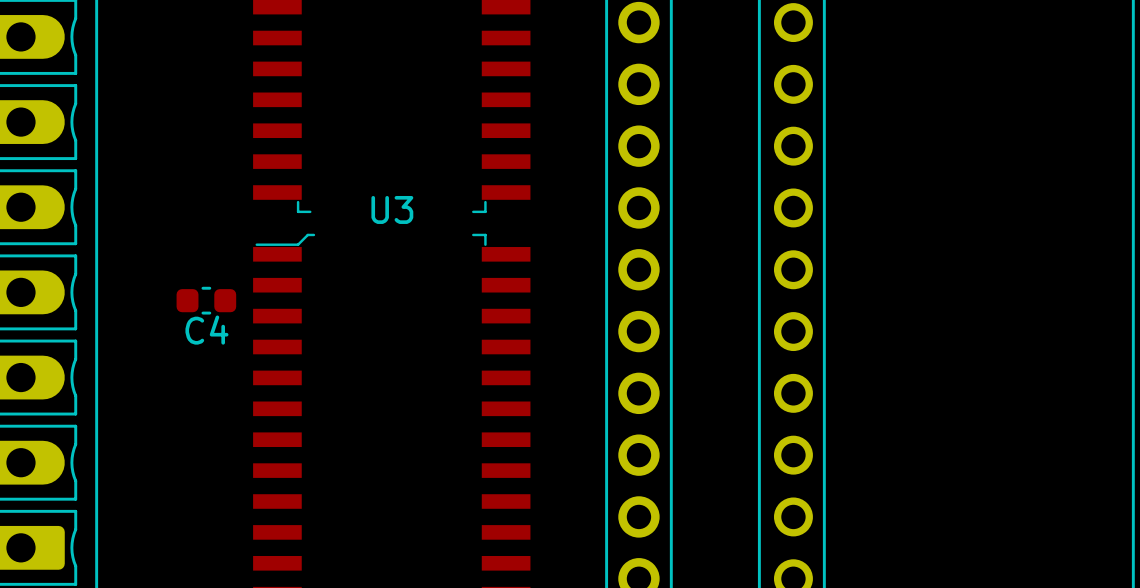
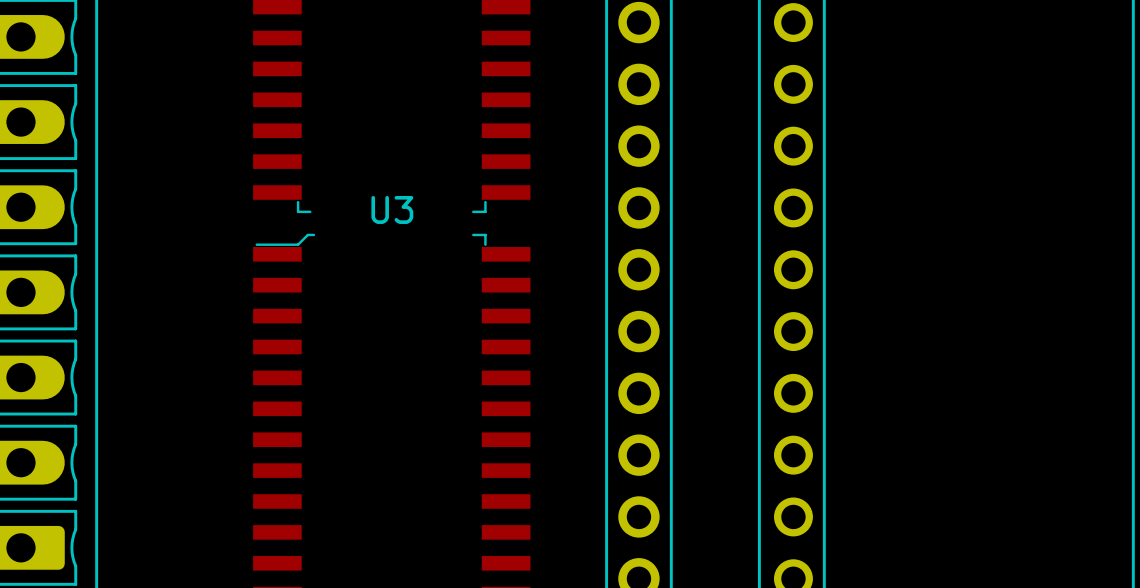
C4: (206, 300) -> none

